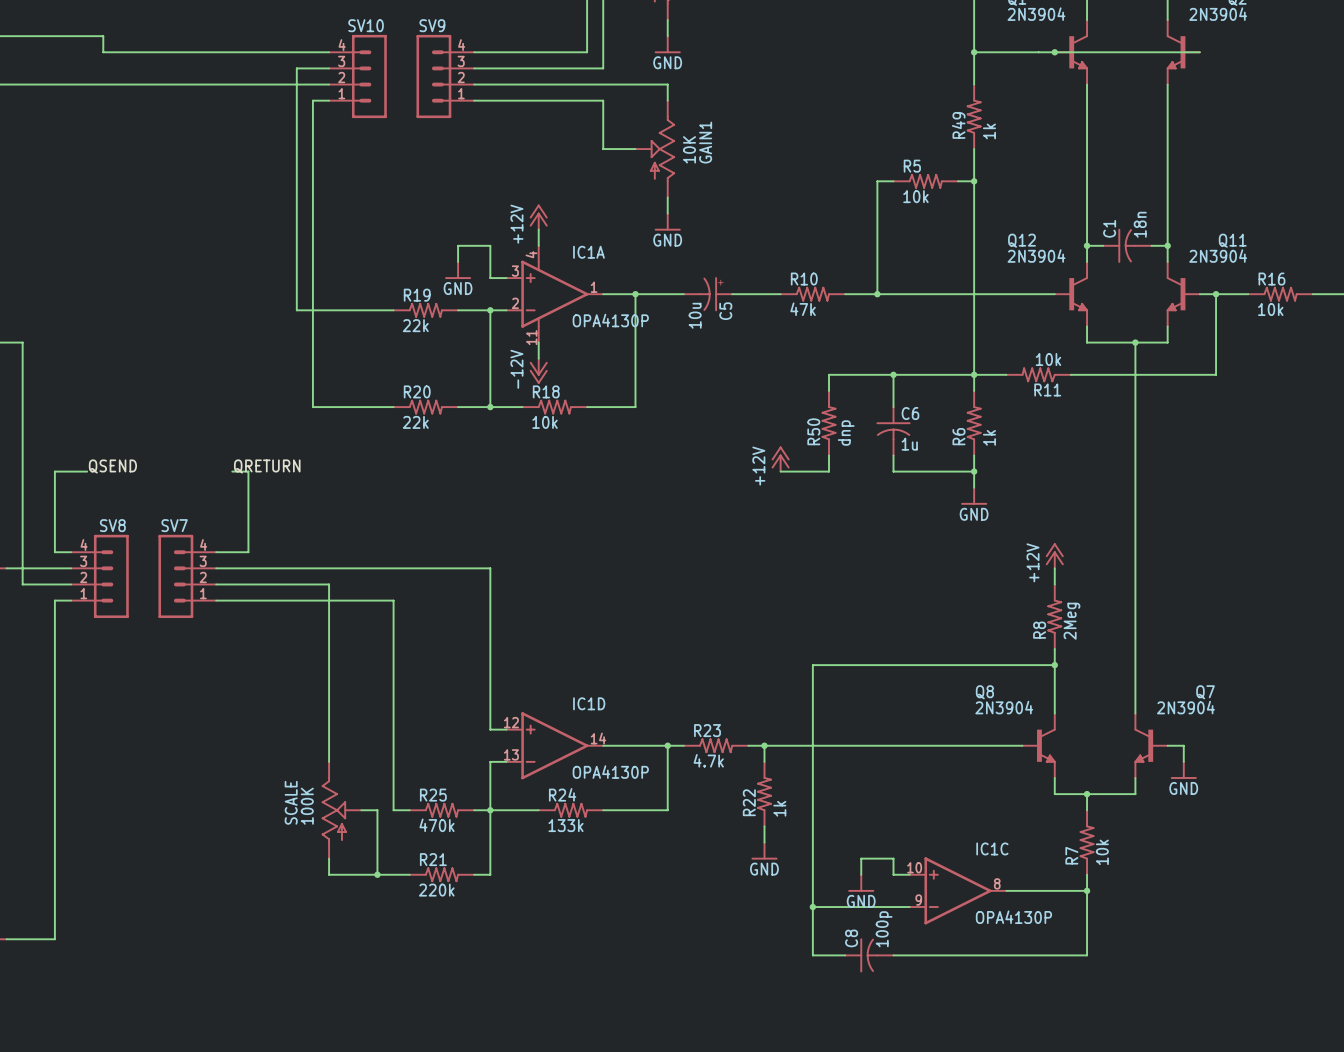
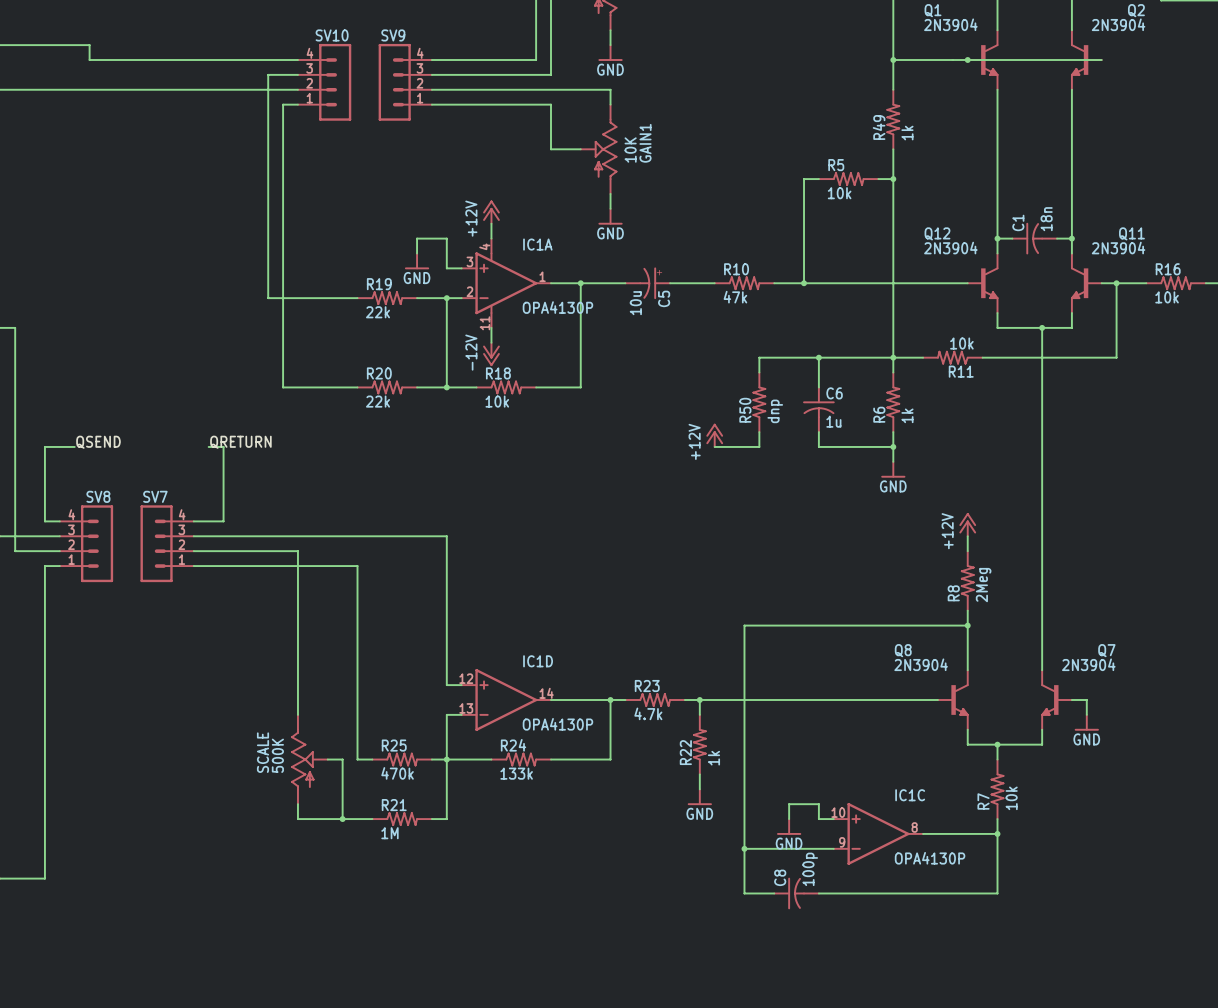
SCALE value: 100K (307, 806) -> 500K (277, 755)
R21 value: 220k (436, 890) -> 1M (389, 833)

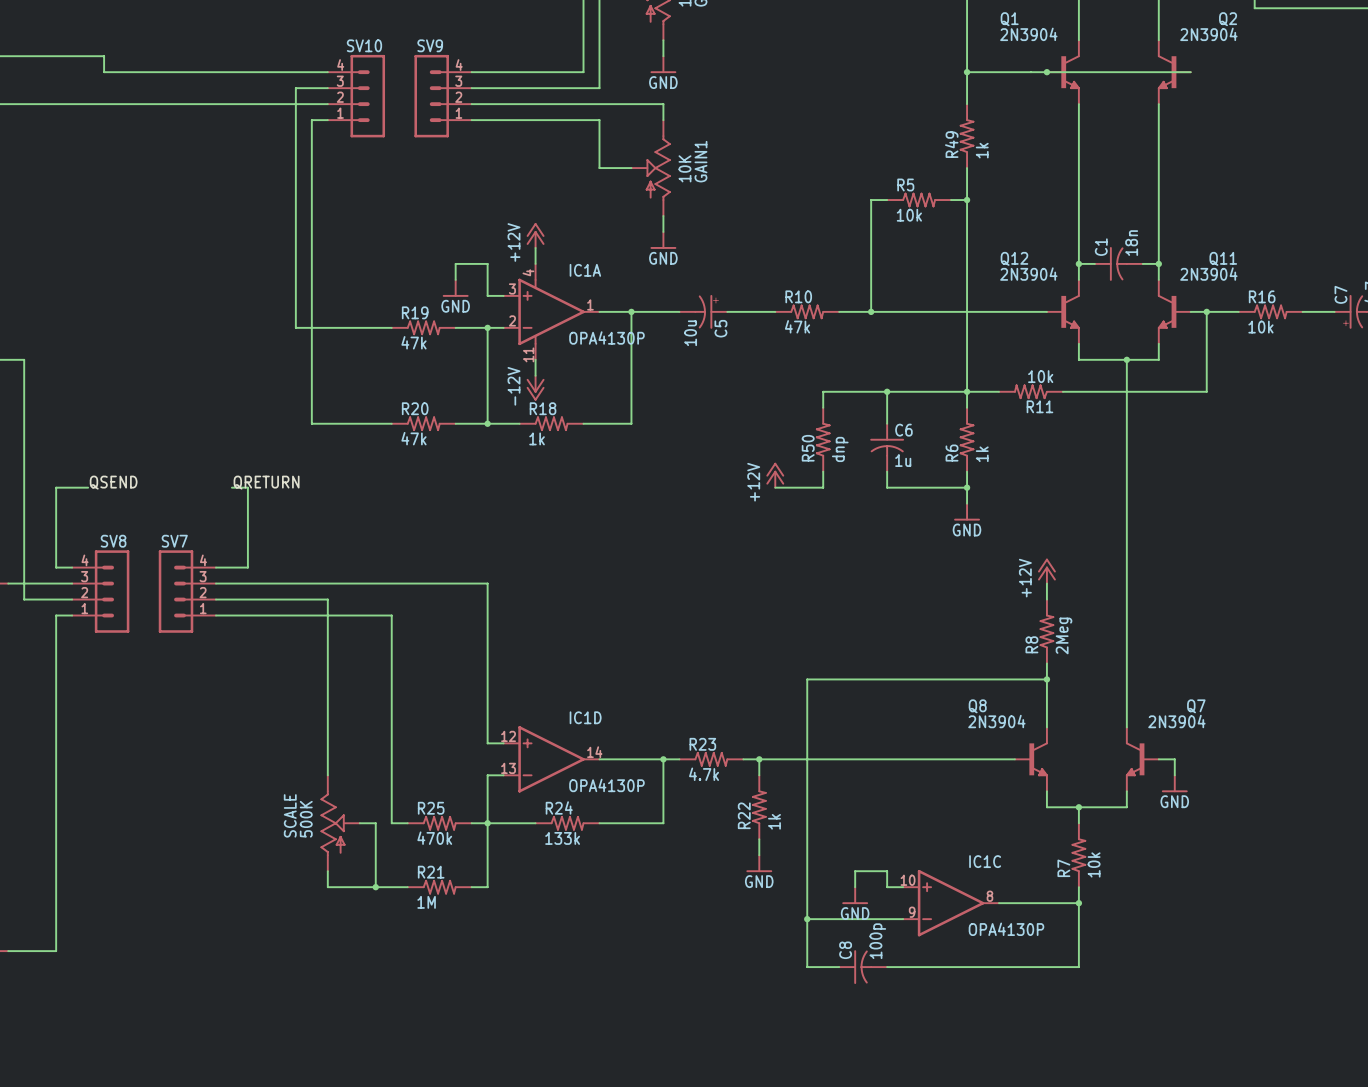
R19 value: 22k (378, 312) -> 47k (413, 342)
R20 value: 22k (378, 401) -> 47k (413, 438)
R18 value: 10k (497, 401) -> 1k (537, 438)

